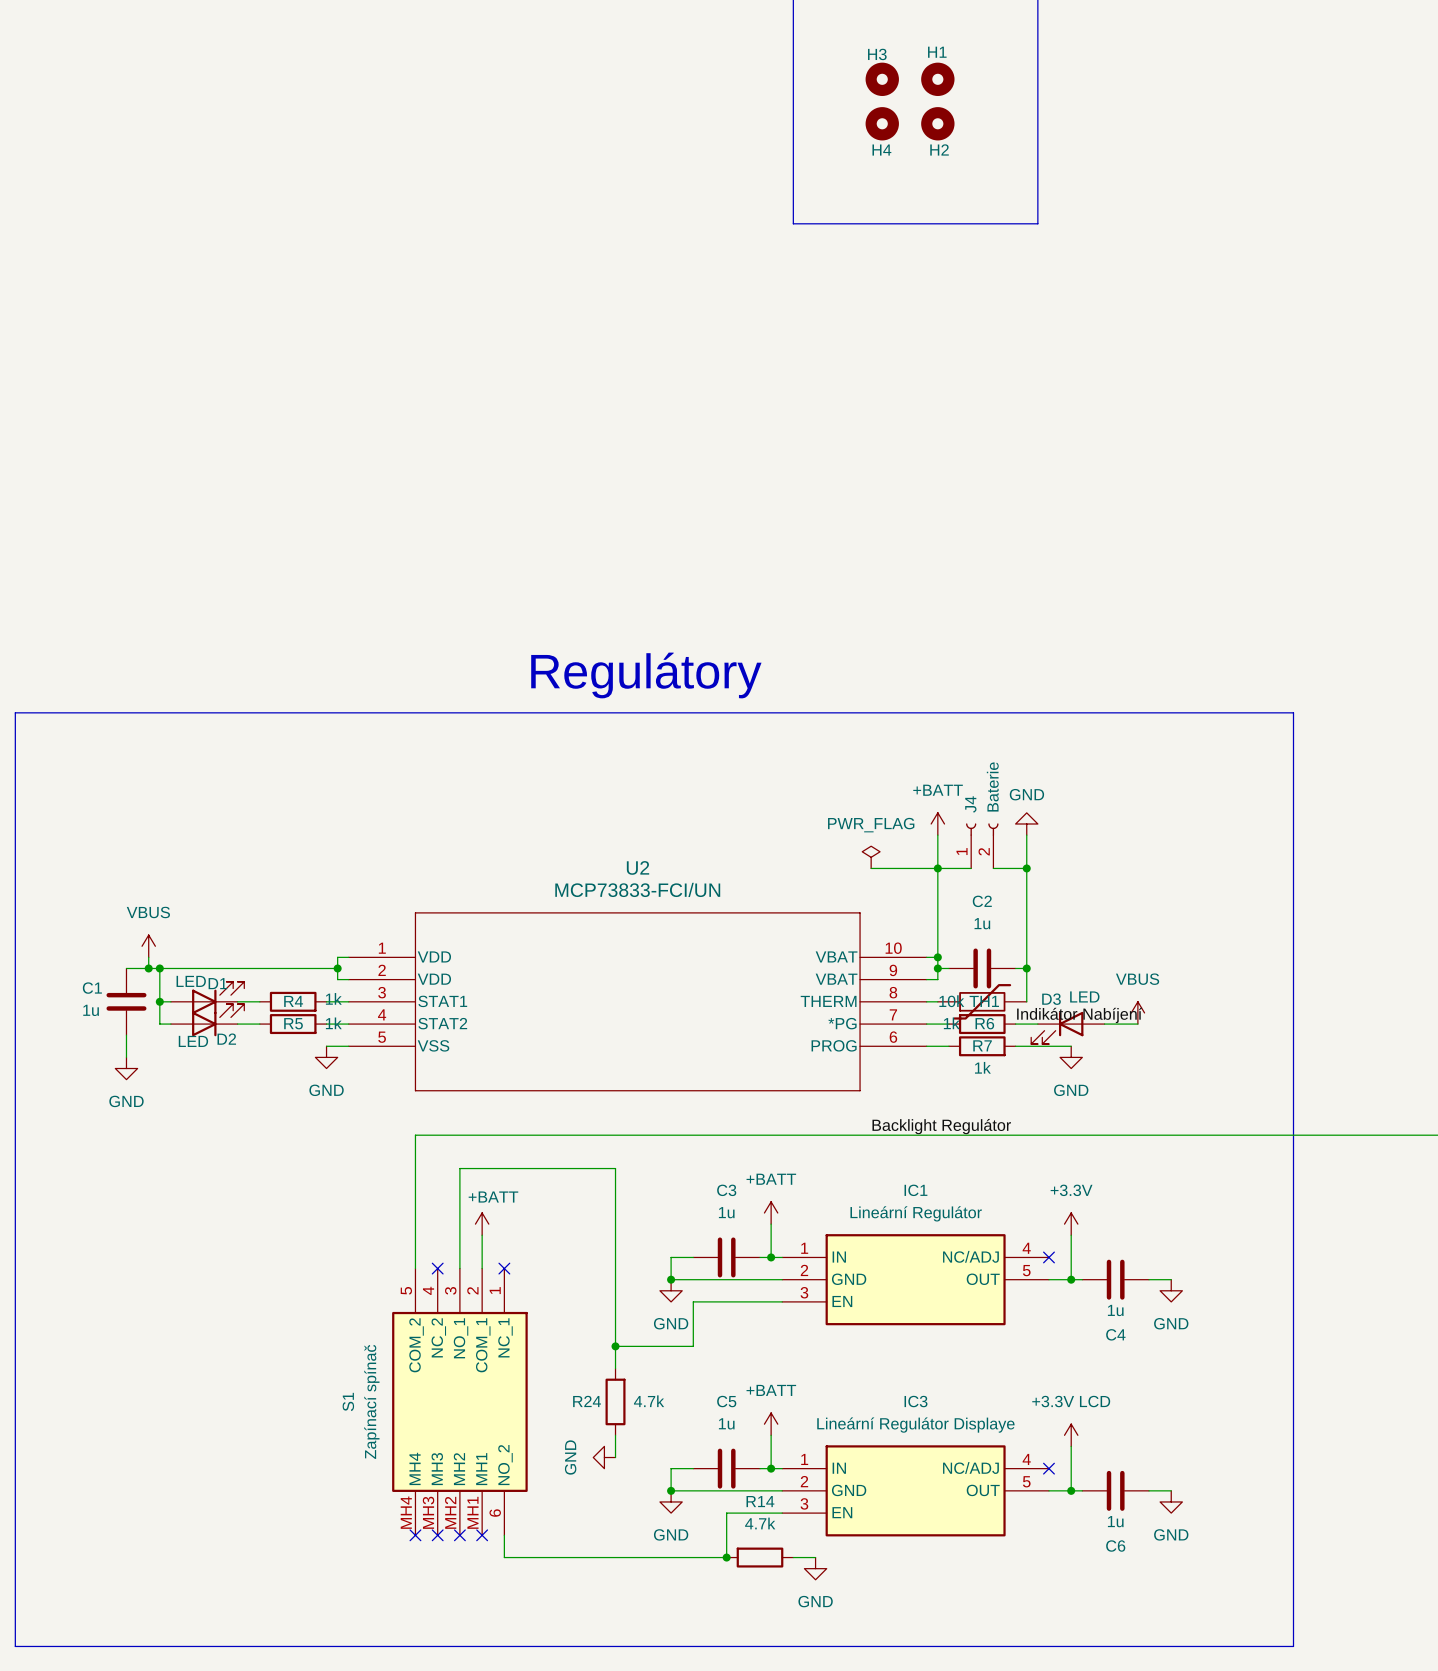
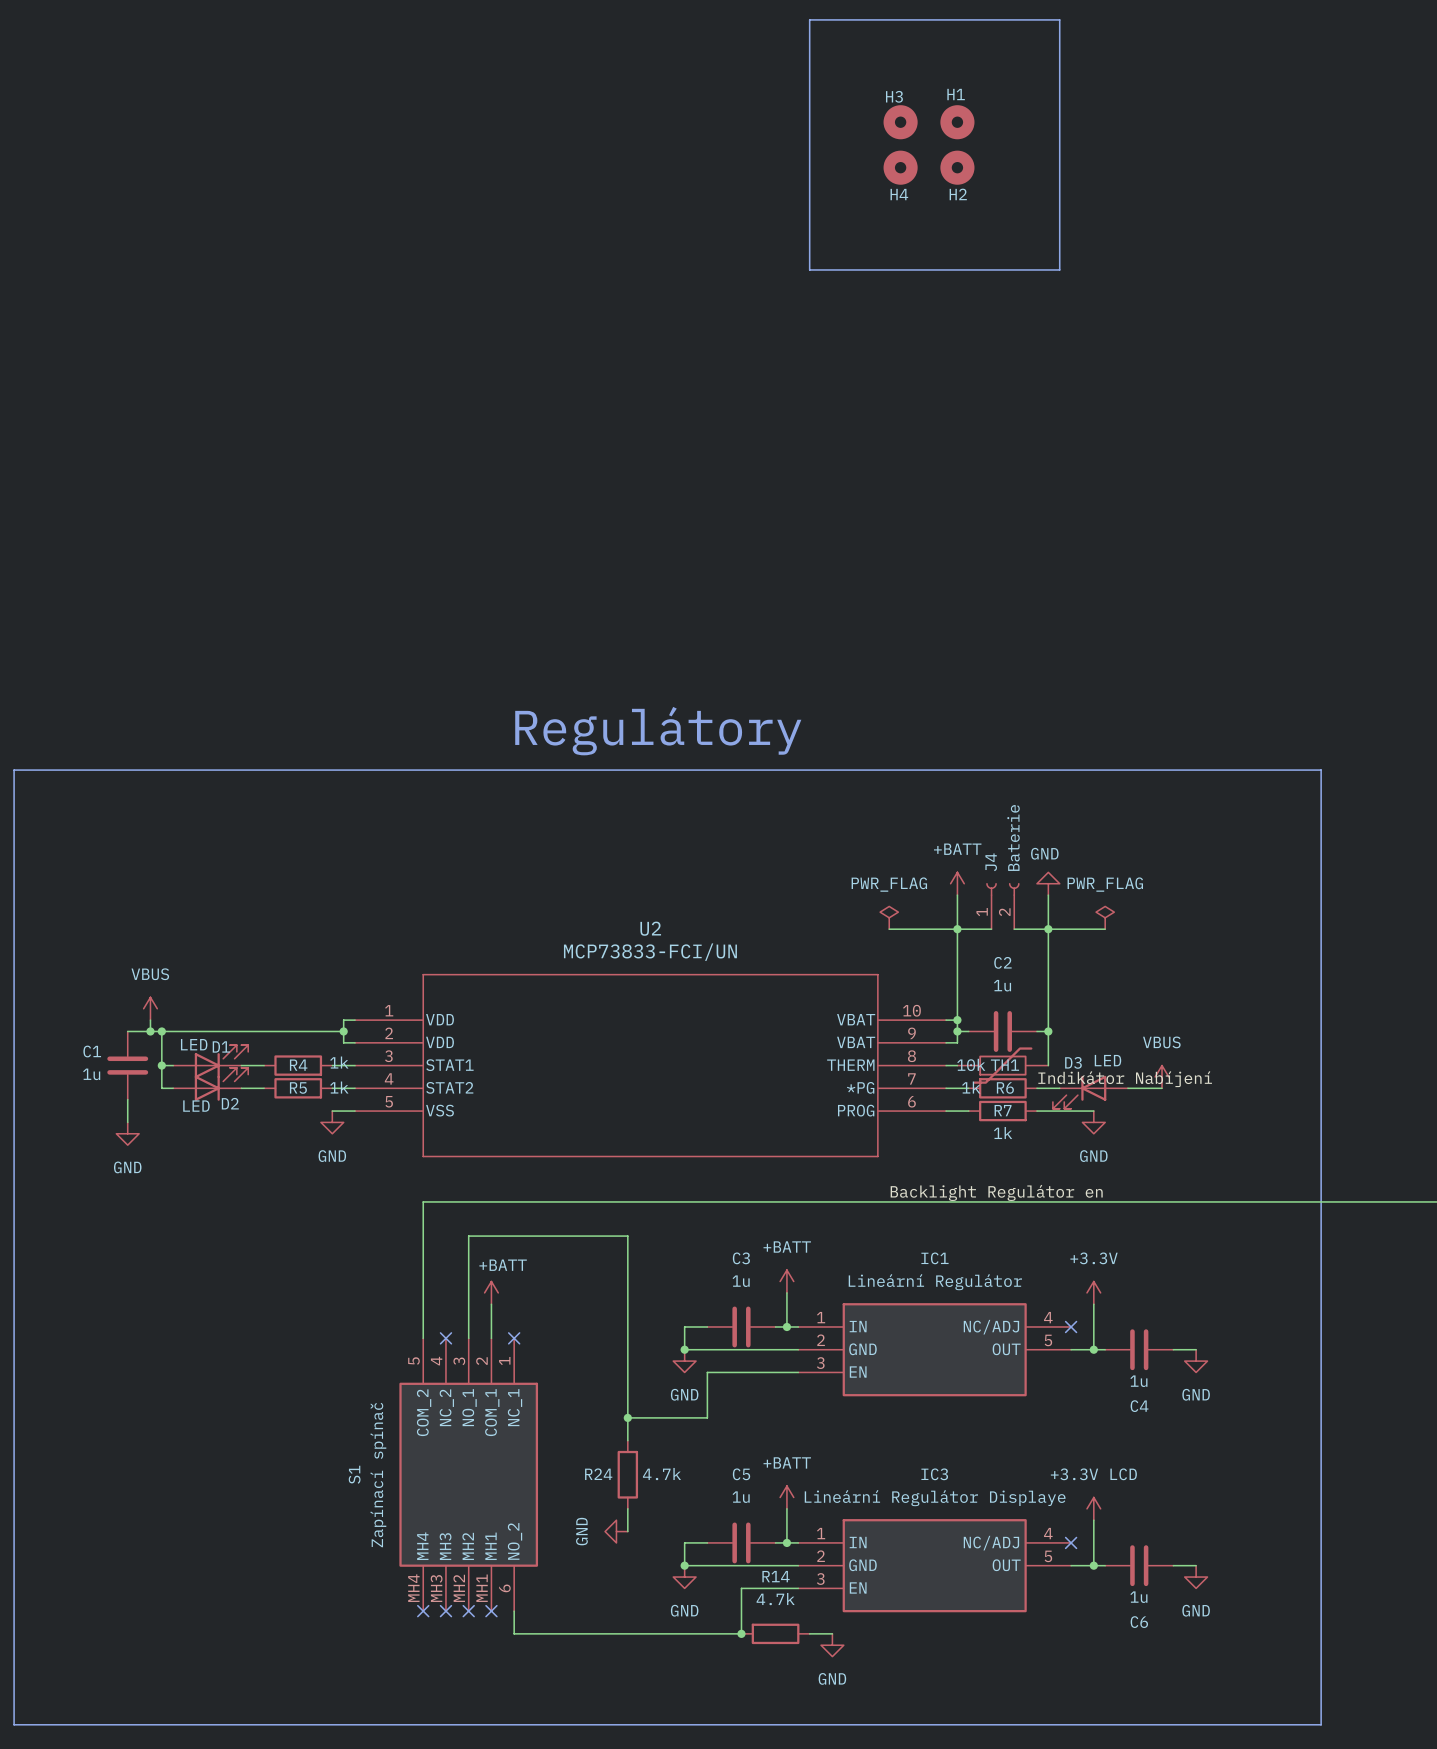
power symbol: none -> PWR_FLAG (1105, 917)
wire: none -> (1048, 929) (1105, 929)
label: Backlight Regulátor (941, 1126) -> Backlight Regulátor en (996, 1192)

